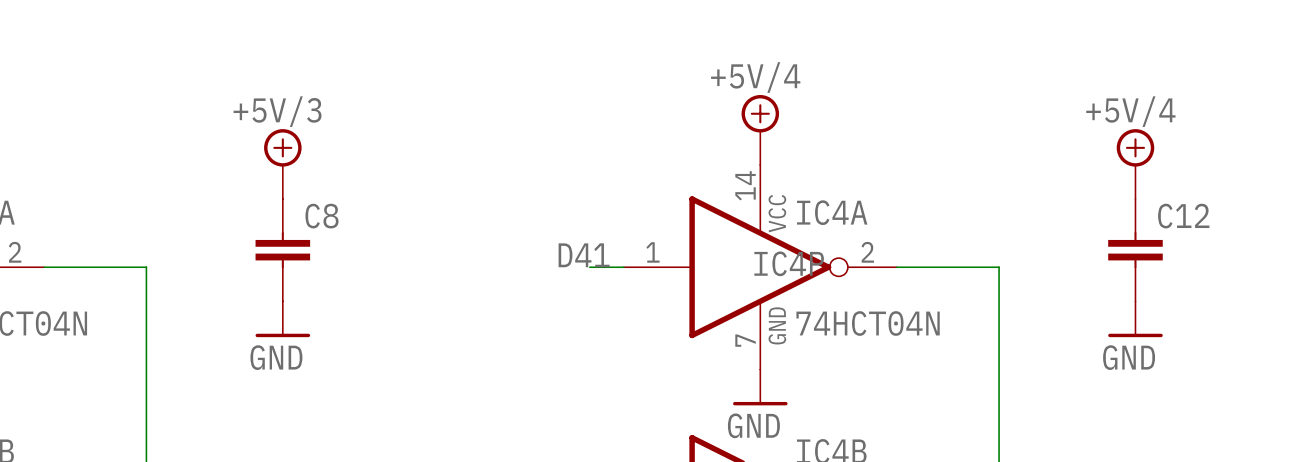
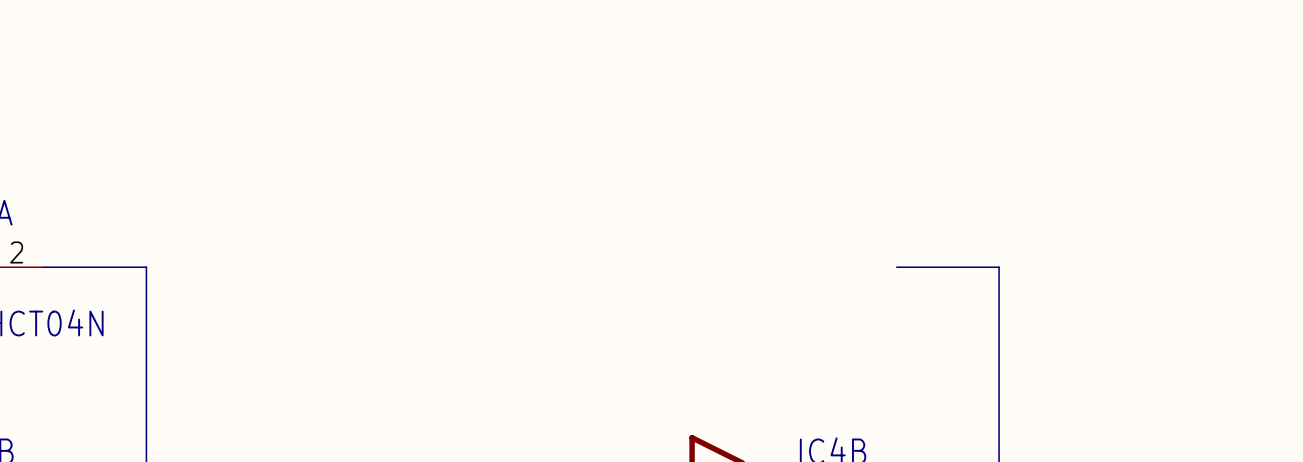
power symbol: +5V/4 (760, 129) -> none
power symbol: +5V/3 (282, 164) -> none
power symbol: +5V/4 (1135, 164) -> none
C8: (282, 250) -> none
C12: (1135, 250) -> none
label: D41 (584, 255) -> none
wire: (589, 267) (623, 267) -> none
IC4A: 74HCT04N (760, 267) -> none
IC4P: (760, 267) -> none
power symbol: GND (282, 319) -> none
power symbol: GND (1135, 319) -> none
power symbol: GND (760, 387) -> none

